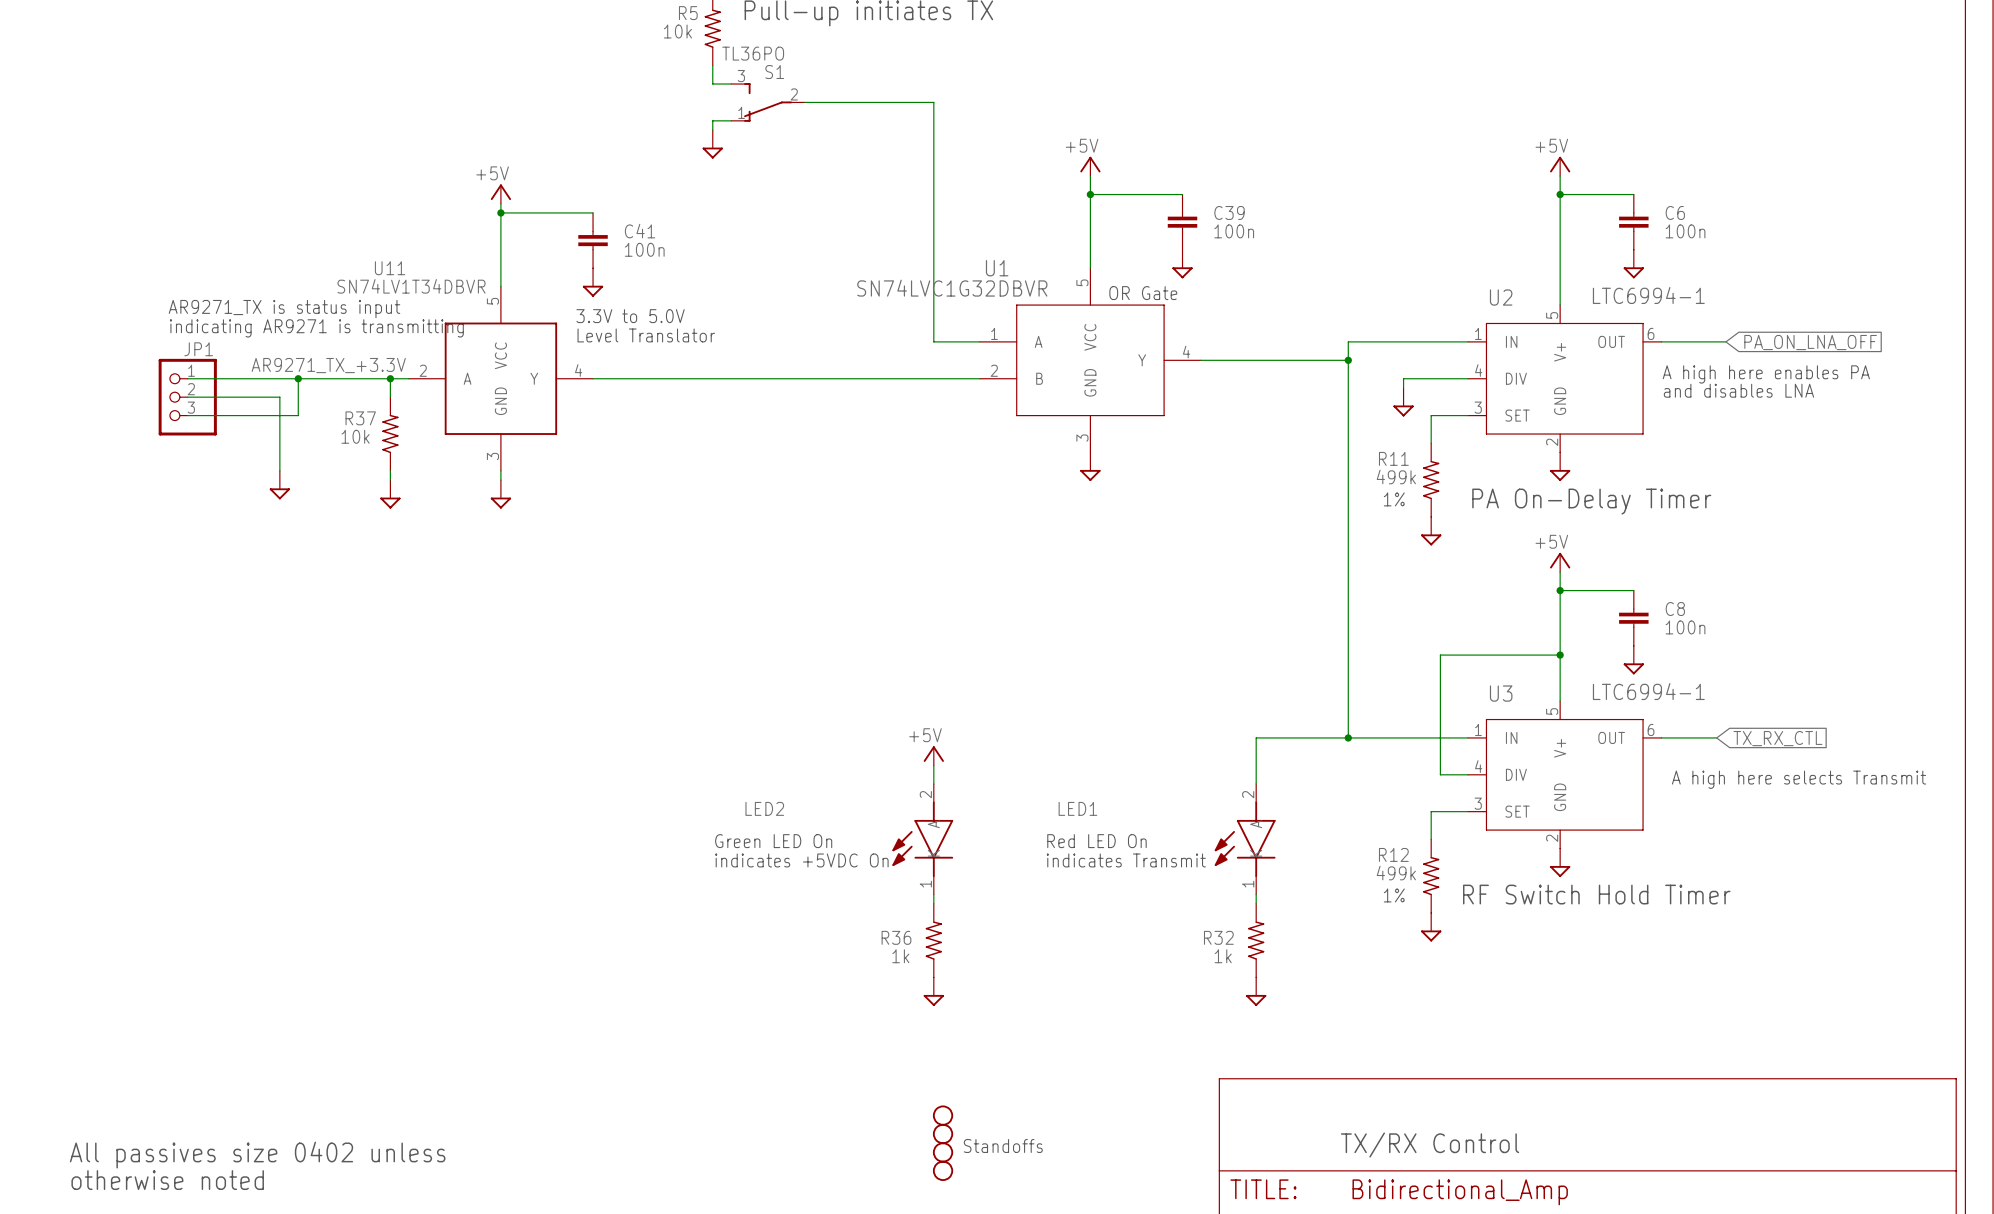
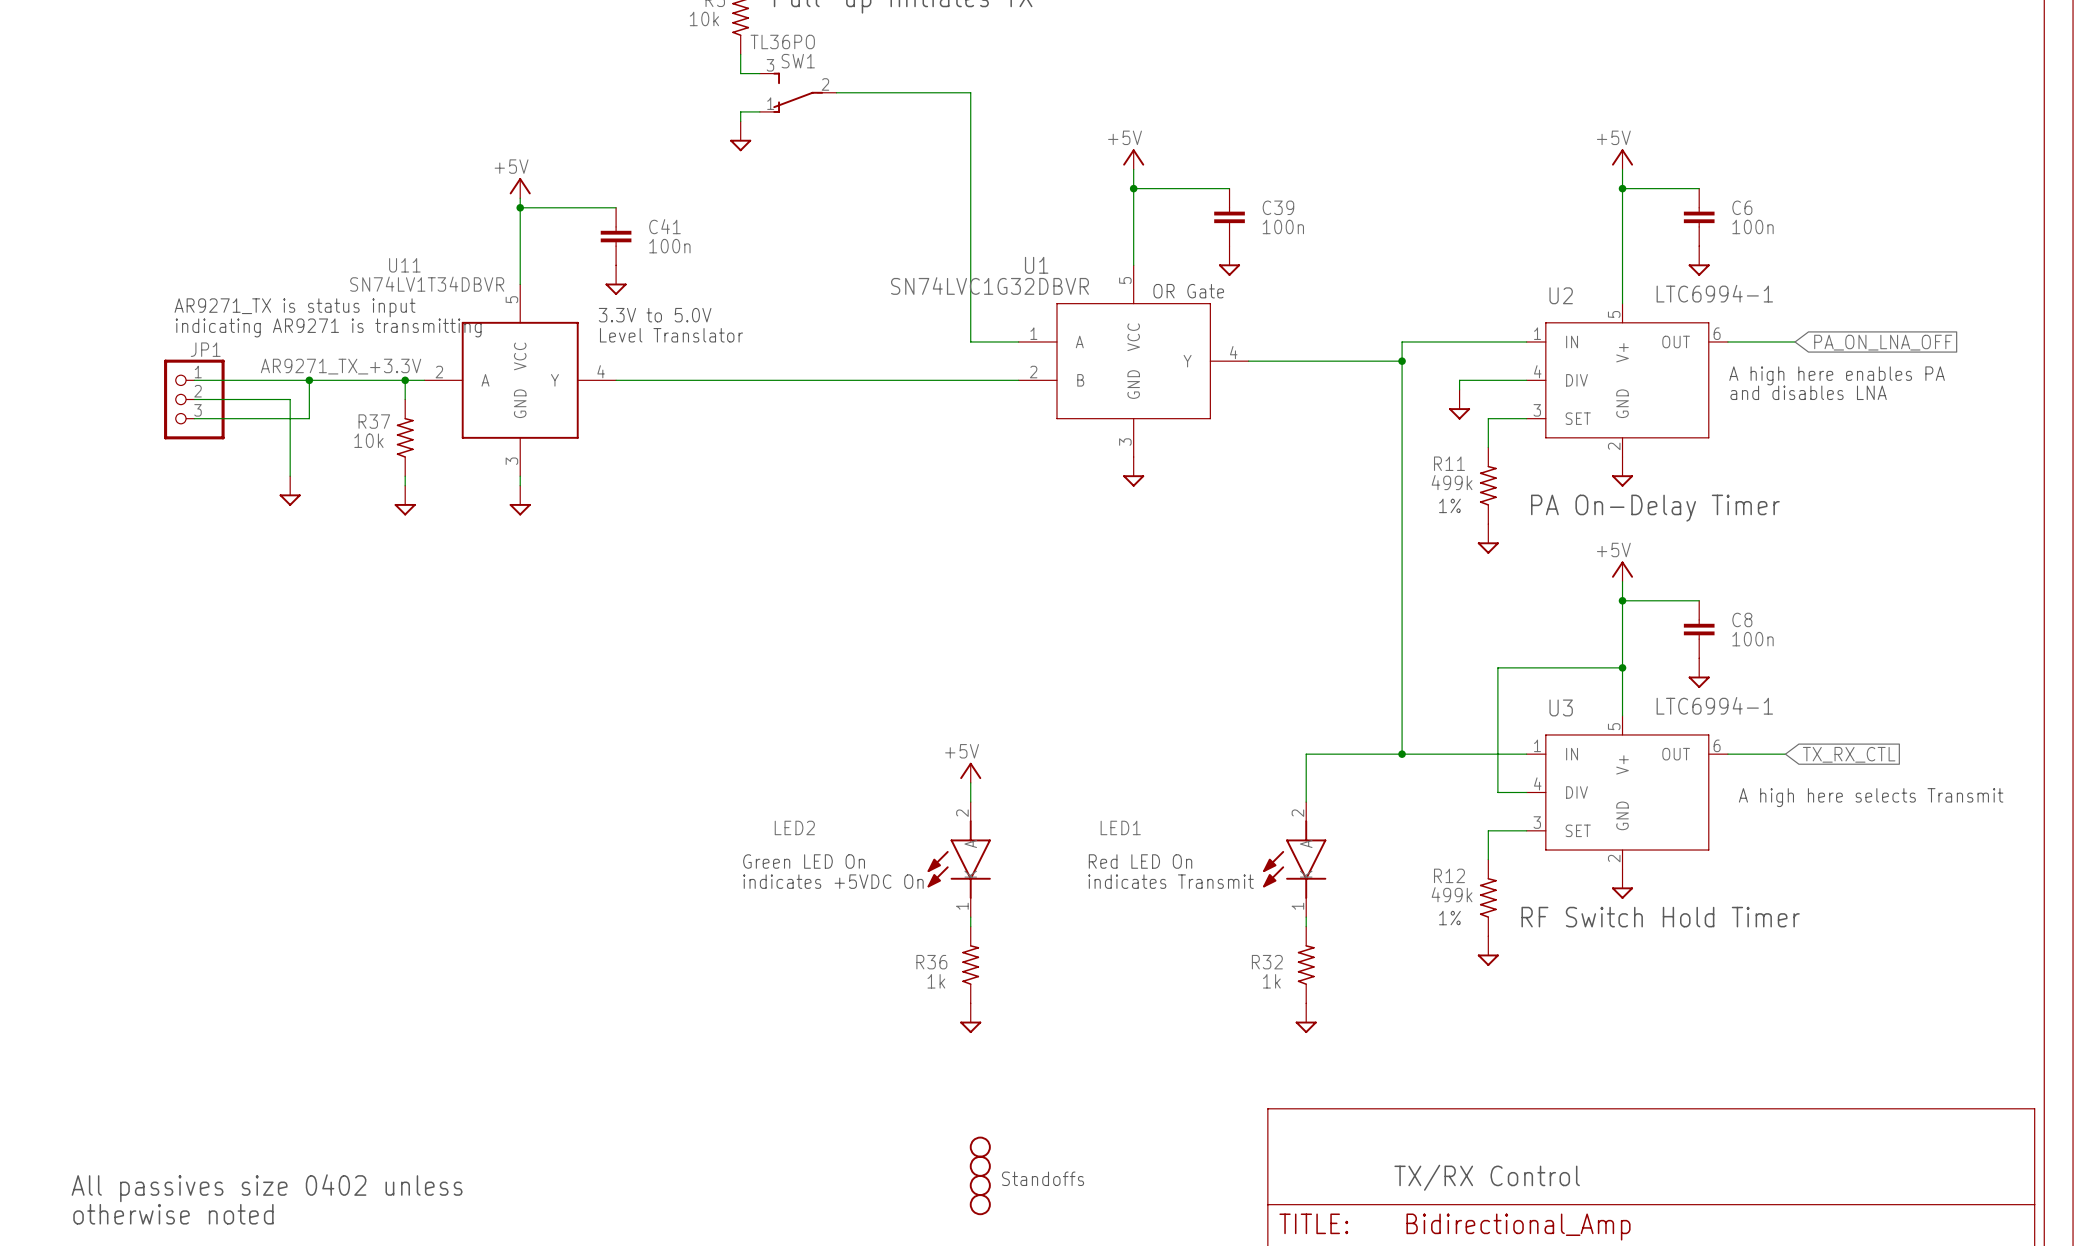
S1 name: S1 (774, 72) -> SW1 (798, 61)

